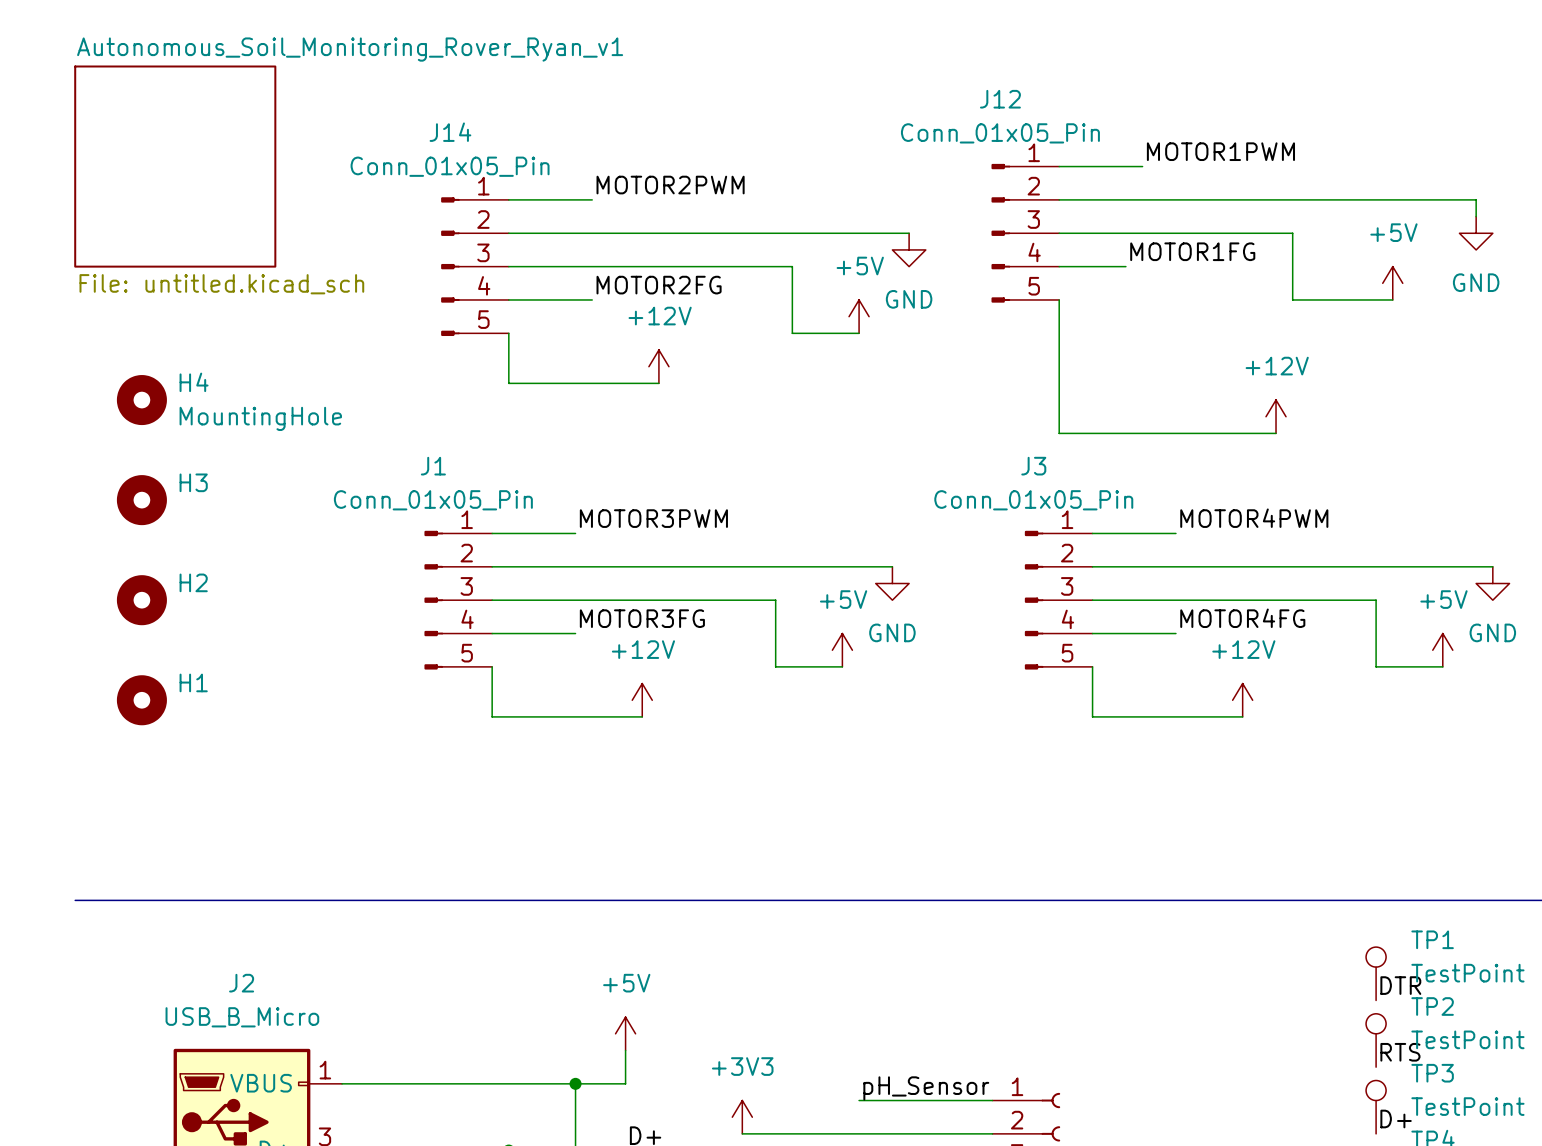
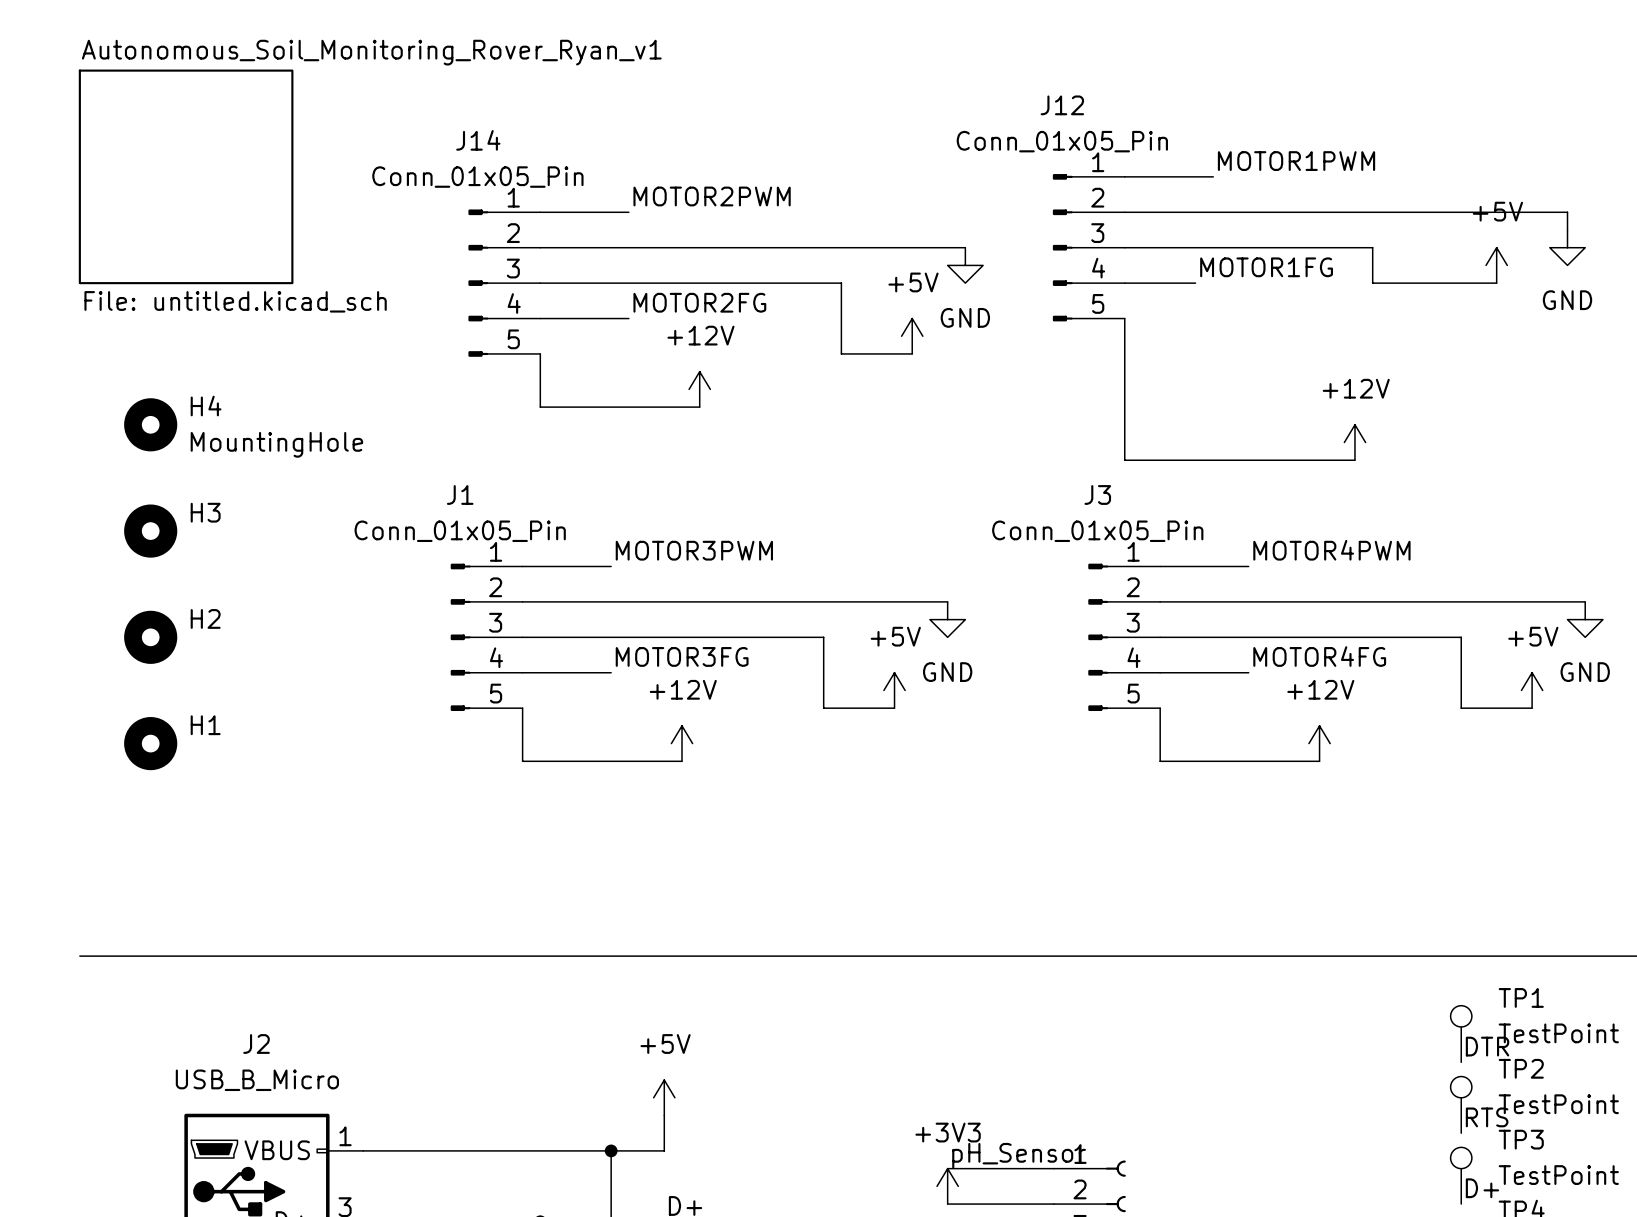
wire: (1292, 266) (1292, 299) (1392, 299) -> (1372, 283) (1496, 283)
power symbol position: +5V (1392, 283) -> +5V (1496, 265)
label position: pH_Sensor (926, 1088) -> pH_Sensor (1019, 1155)
wire: (859, 1100) (892, 1100) -> none
power symbol: +3V3 (742, 1117) -> none
power symbol: none -> +3V3 (947, 1186)
wire: (742, 1133) (892, 1133) -> none

